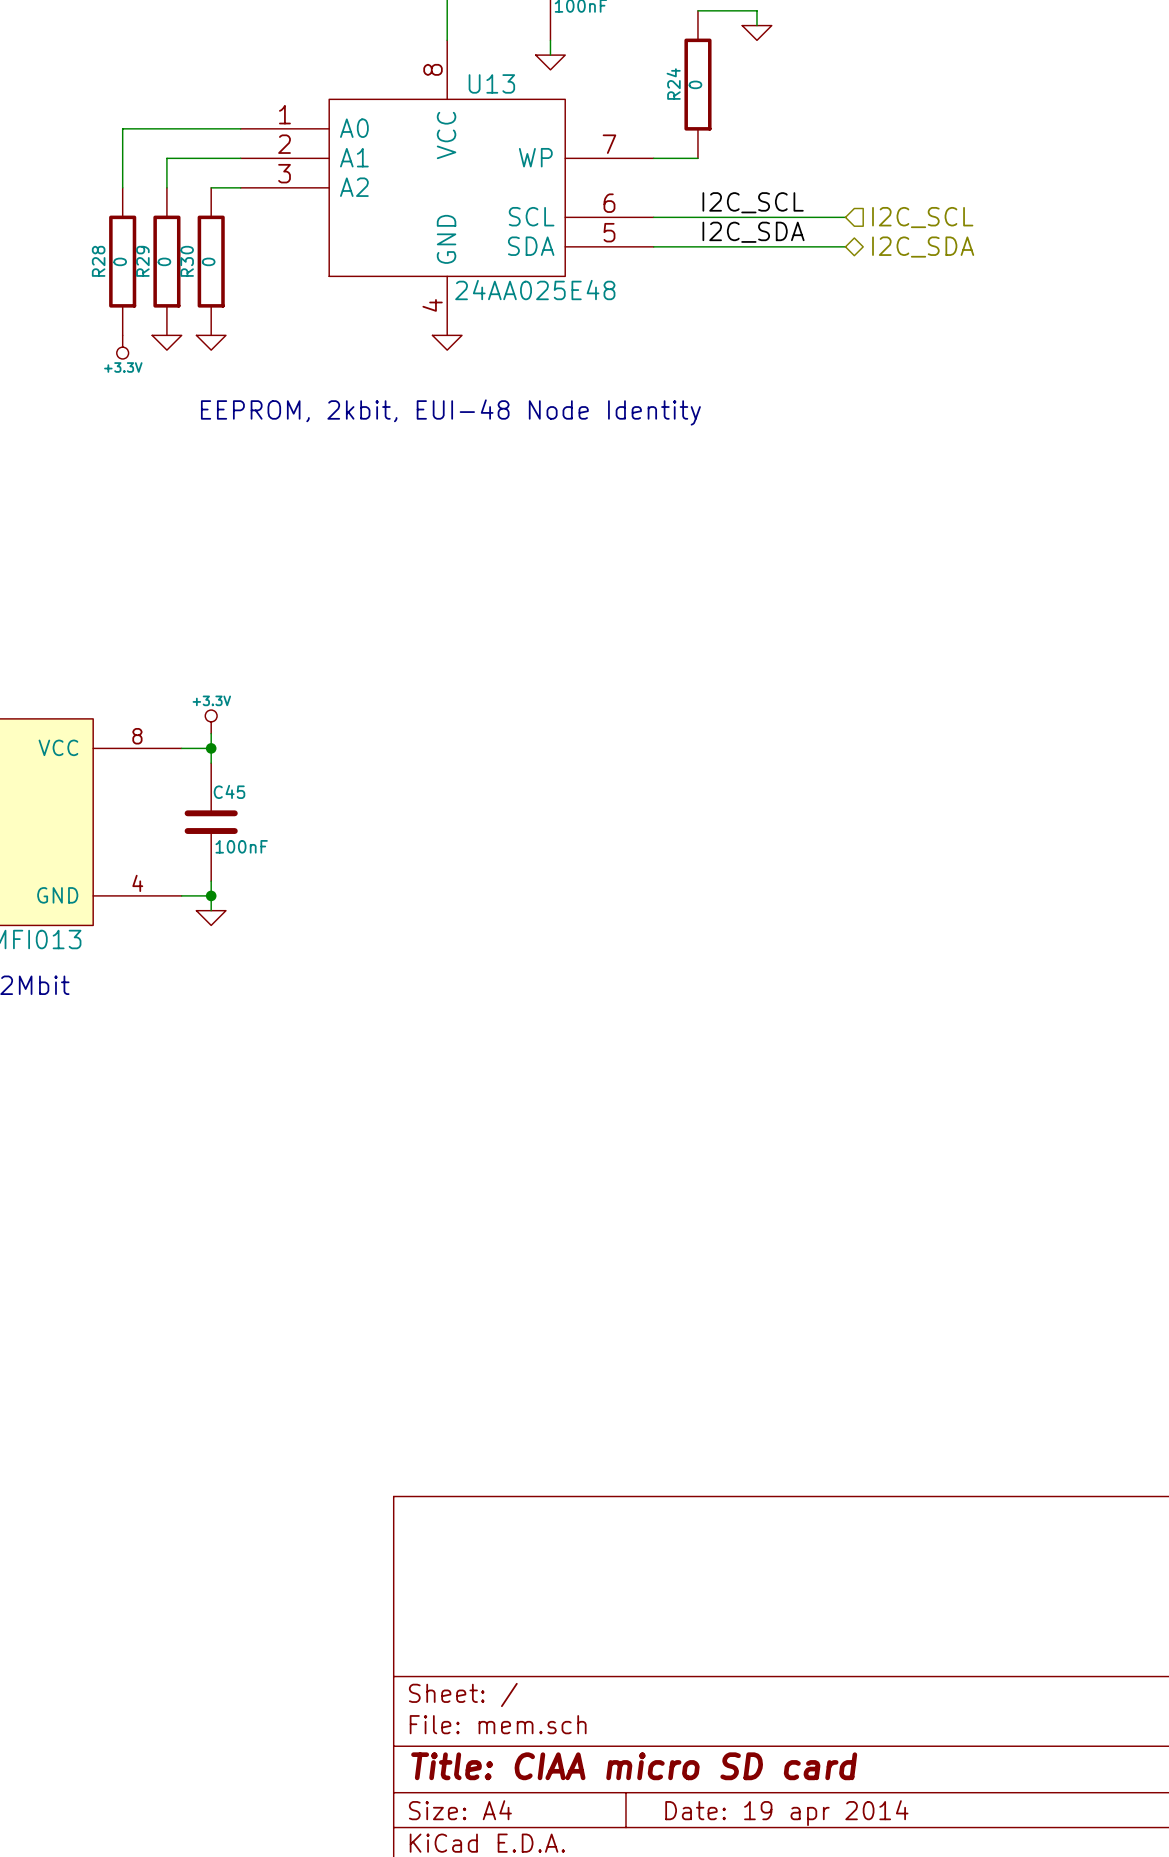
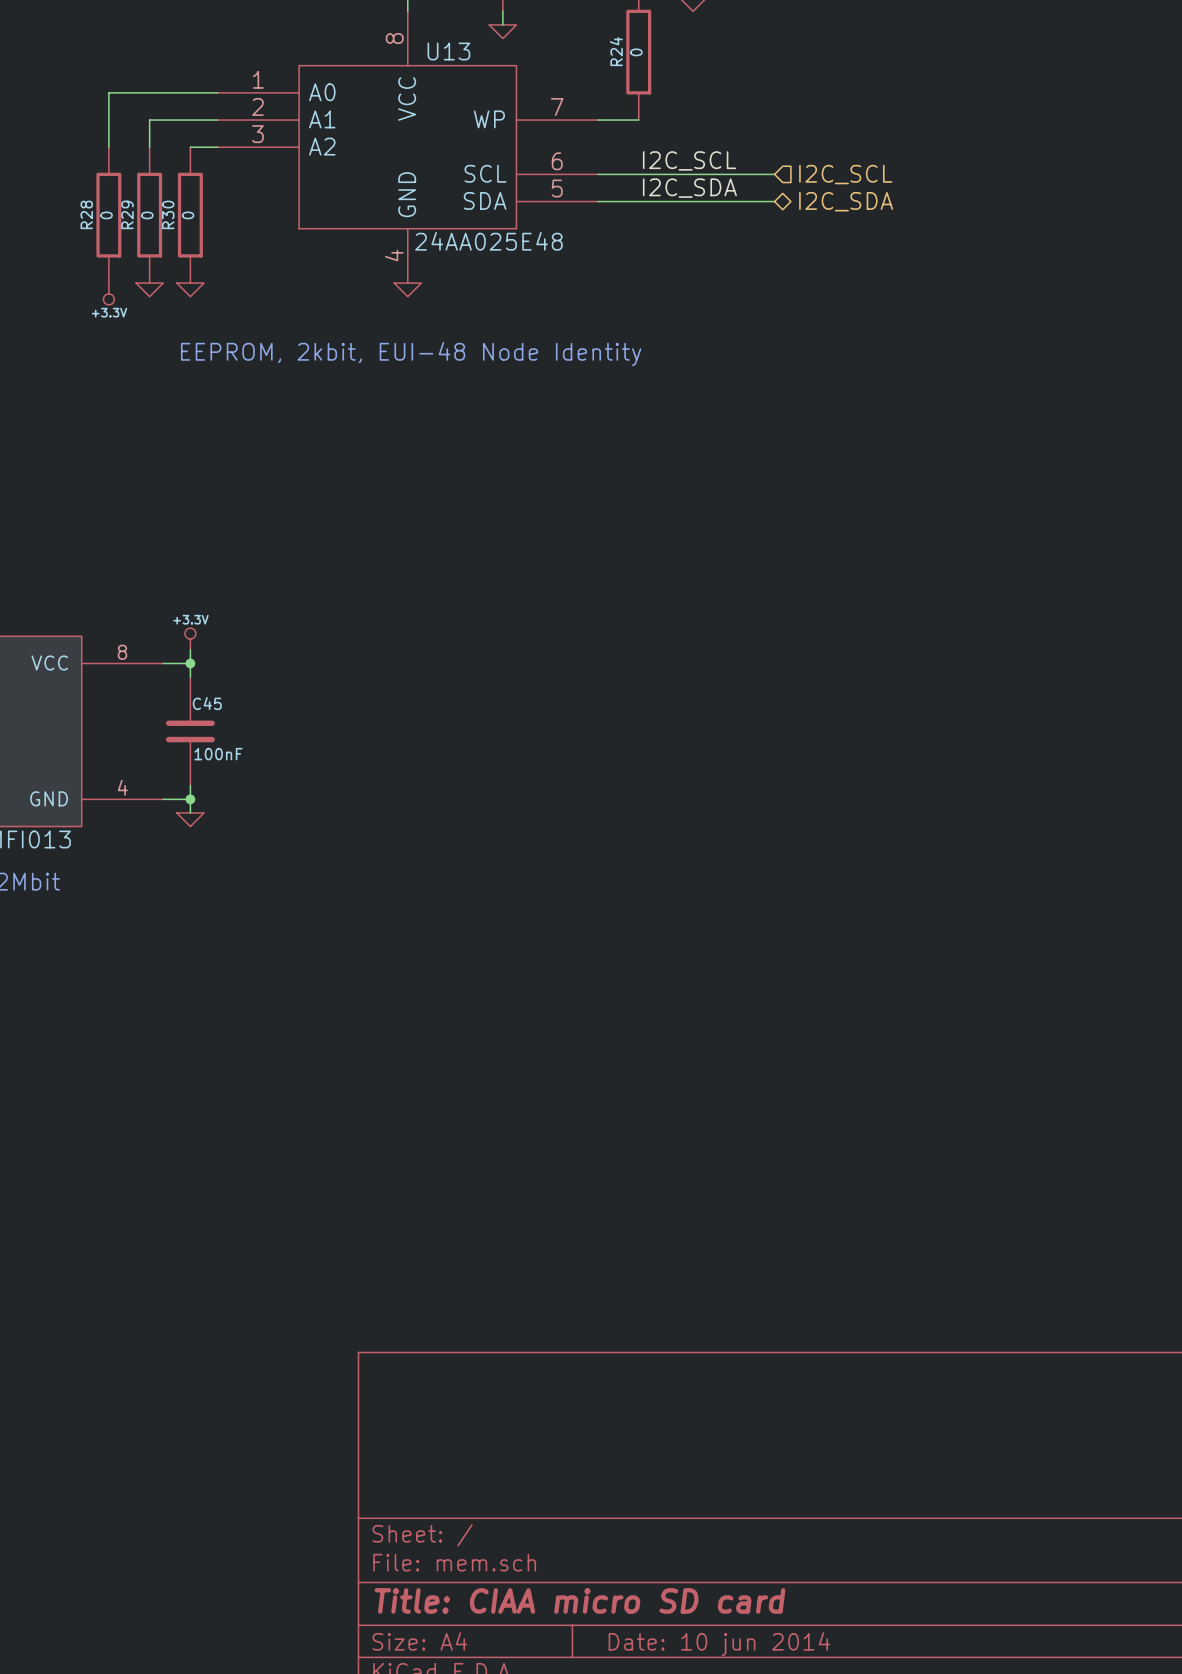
title block: Date: 19 apr 2014 (786, 1813) -> Date: 10 jun 2014 (719, 1644)

